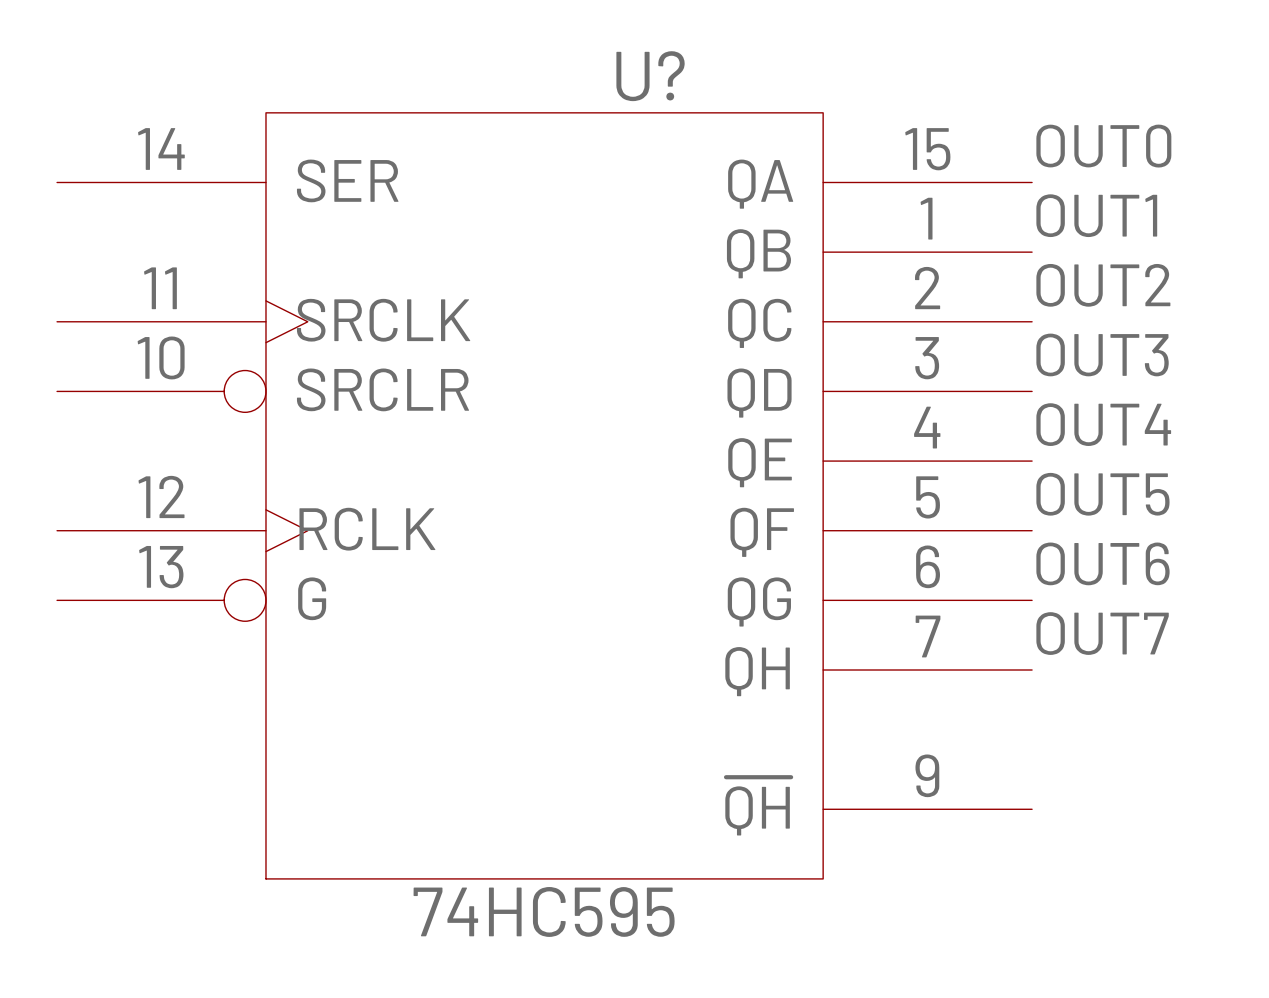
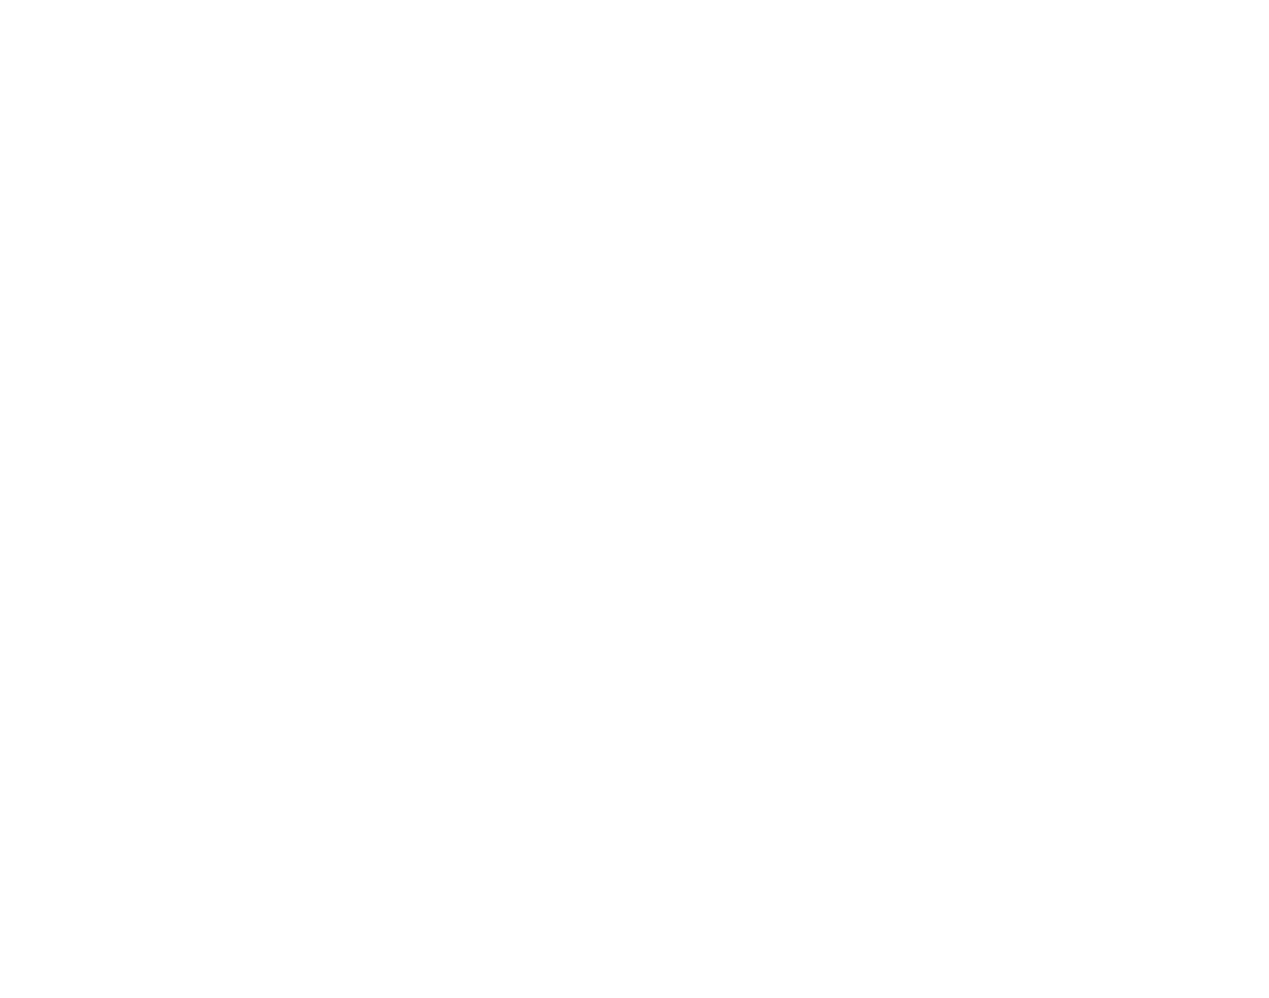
label: OUT0 (1103, 146) -> none
label: OUT1 (1096, 215) -> none
label: OUT2 (1103, 285) -> none
label: OUT3 (1102, 354) -> none
label: OUT4 (1103, 424) -> none
label: OUT5 (1102, 494) -> none
U?: 74HC595 (544, 495) -> none
label: OUT6 (1102, 563) -> none
label: OUT7 (1102, 633) -> none

